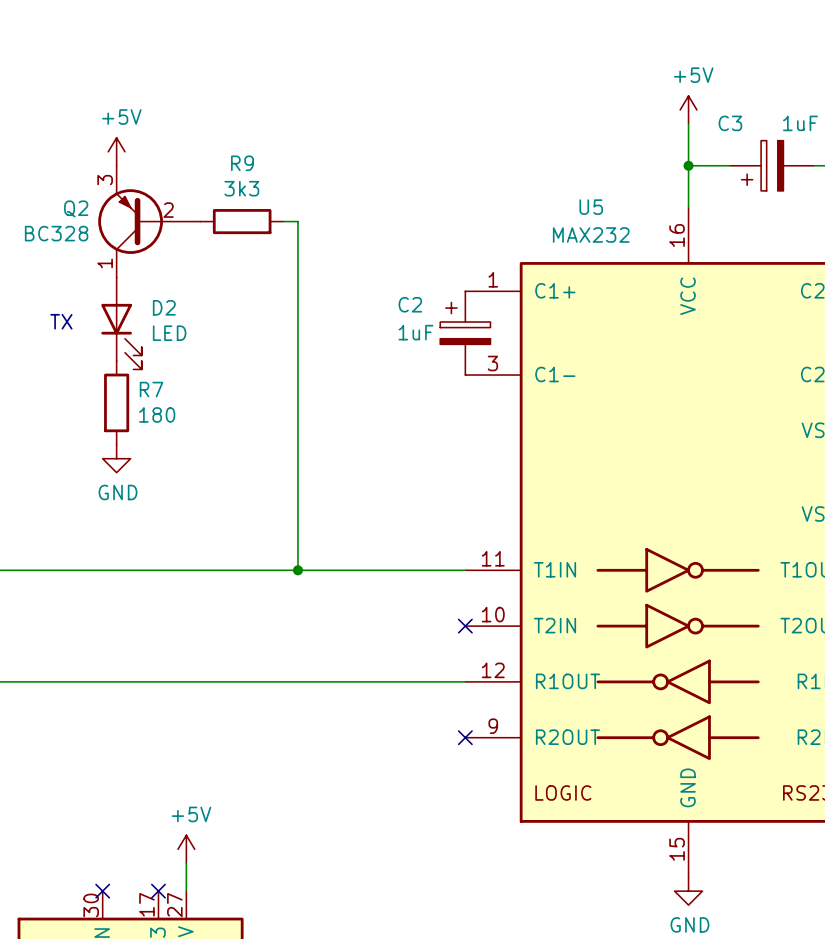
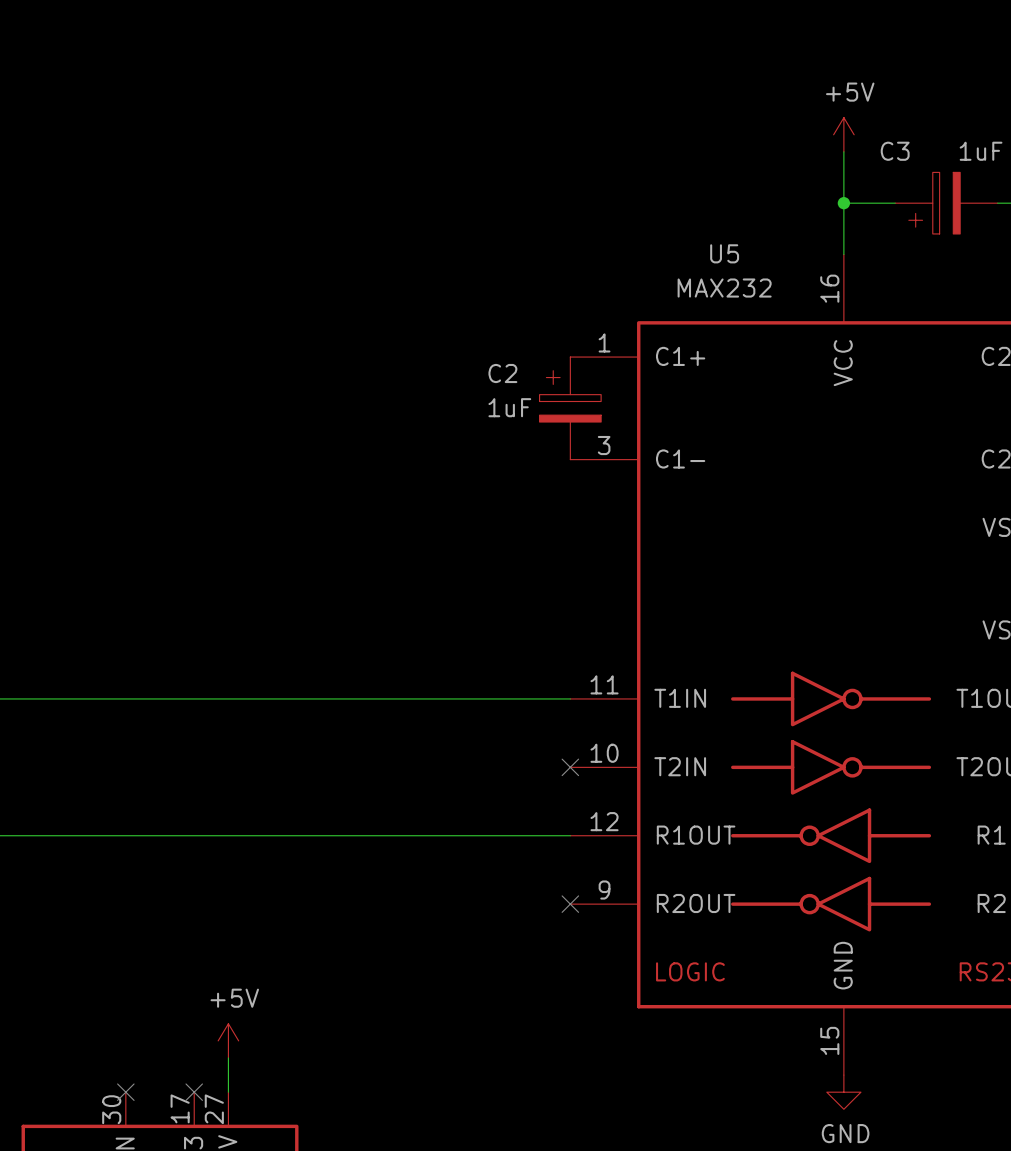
power symbol: +5V (116, 151) -> none
Q2: BC328 (149, 221) -> none
R9: 3k3 (242, 221) -> none
wire: (284, 221) (297, 221) (297, 570) -> none
text: TX (61, 321) -> none
D2: LED (121, 323) -> none
R7: 180 (116, 402) -> none
power symbol: GND (116, 458) -> none
junction: (297, 570) -> none

